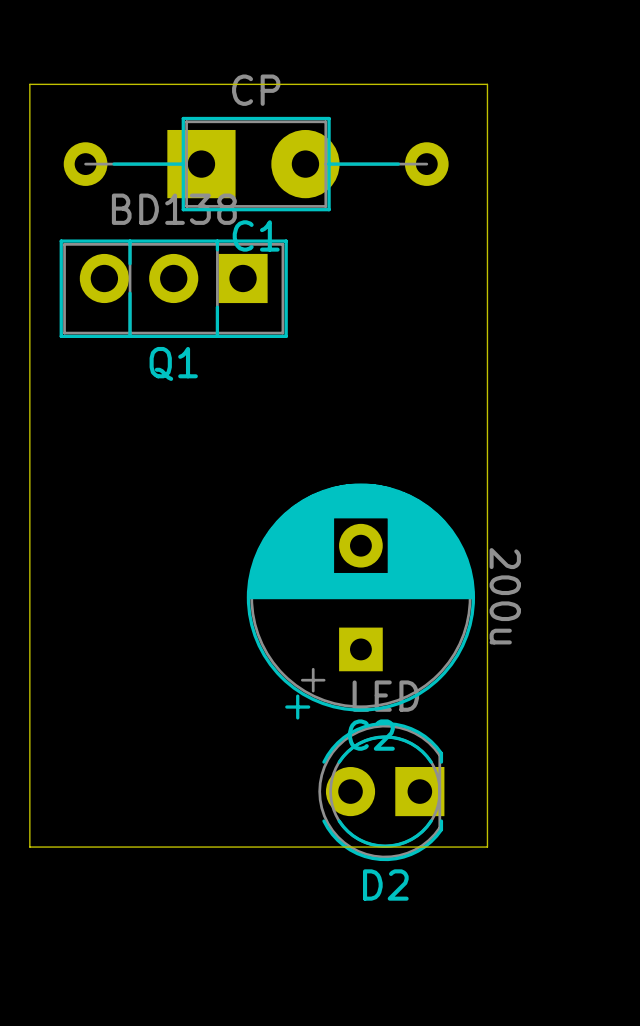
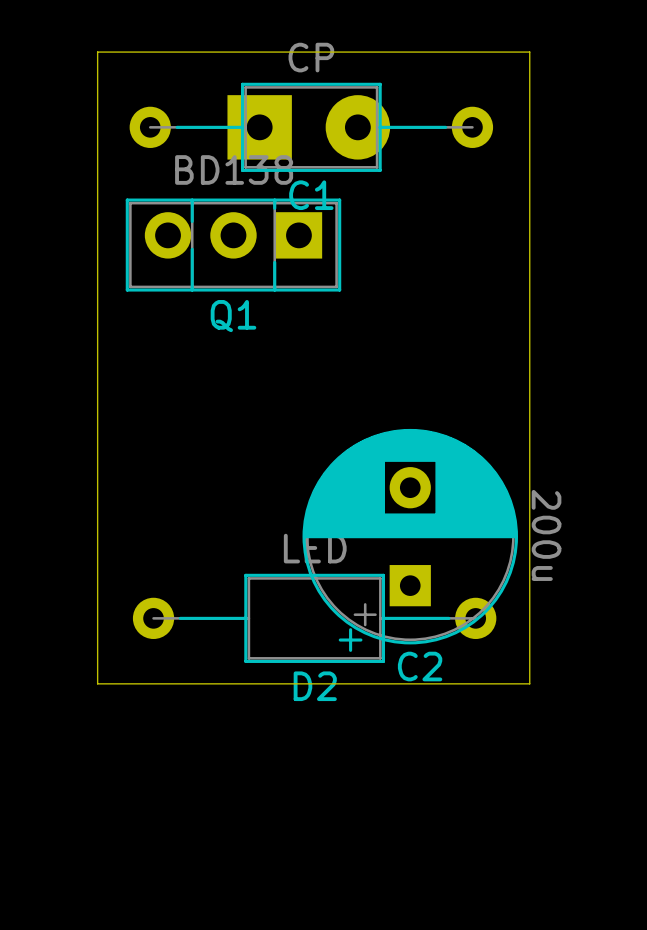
D2 footprint: [318, 722, 445, 862] -> [132, 573, 497, 663]
board edge: (487, 753) (487, 847) (29, 847) (29, 753) -> (529, 683) (97, 683)

